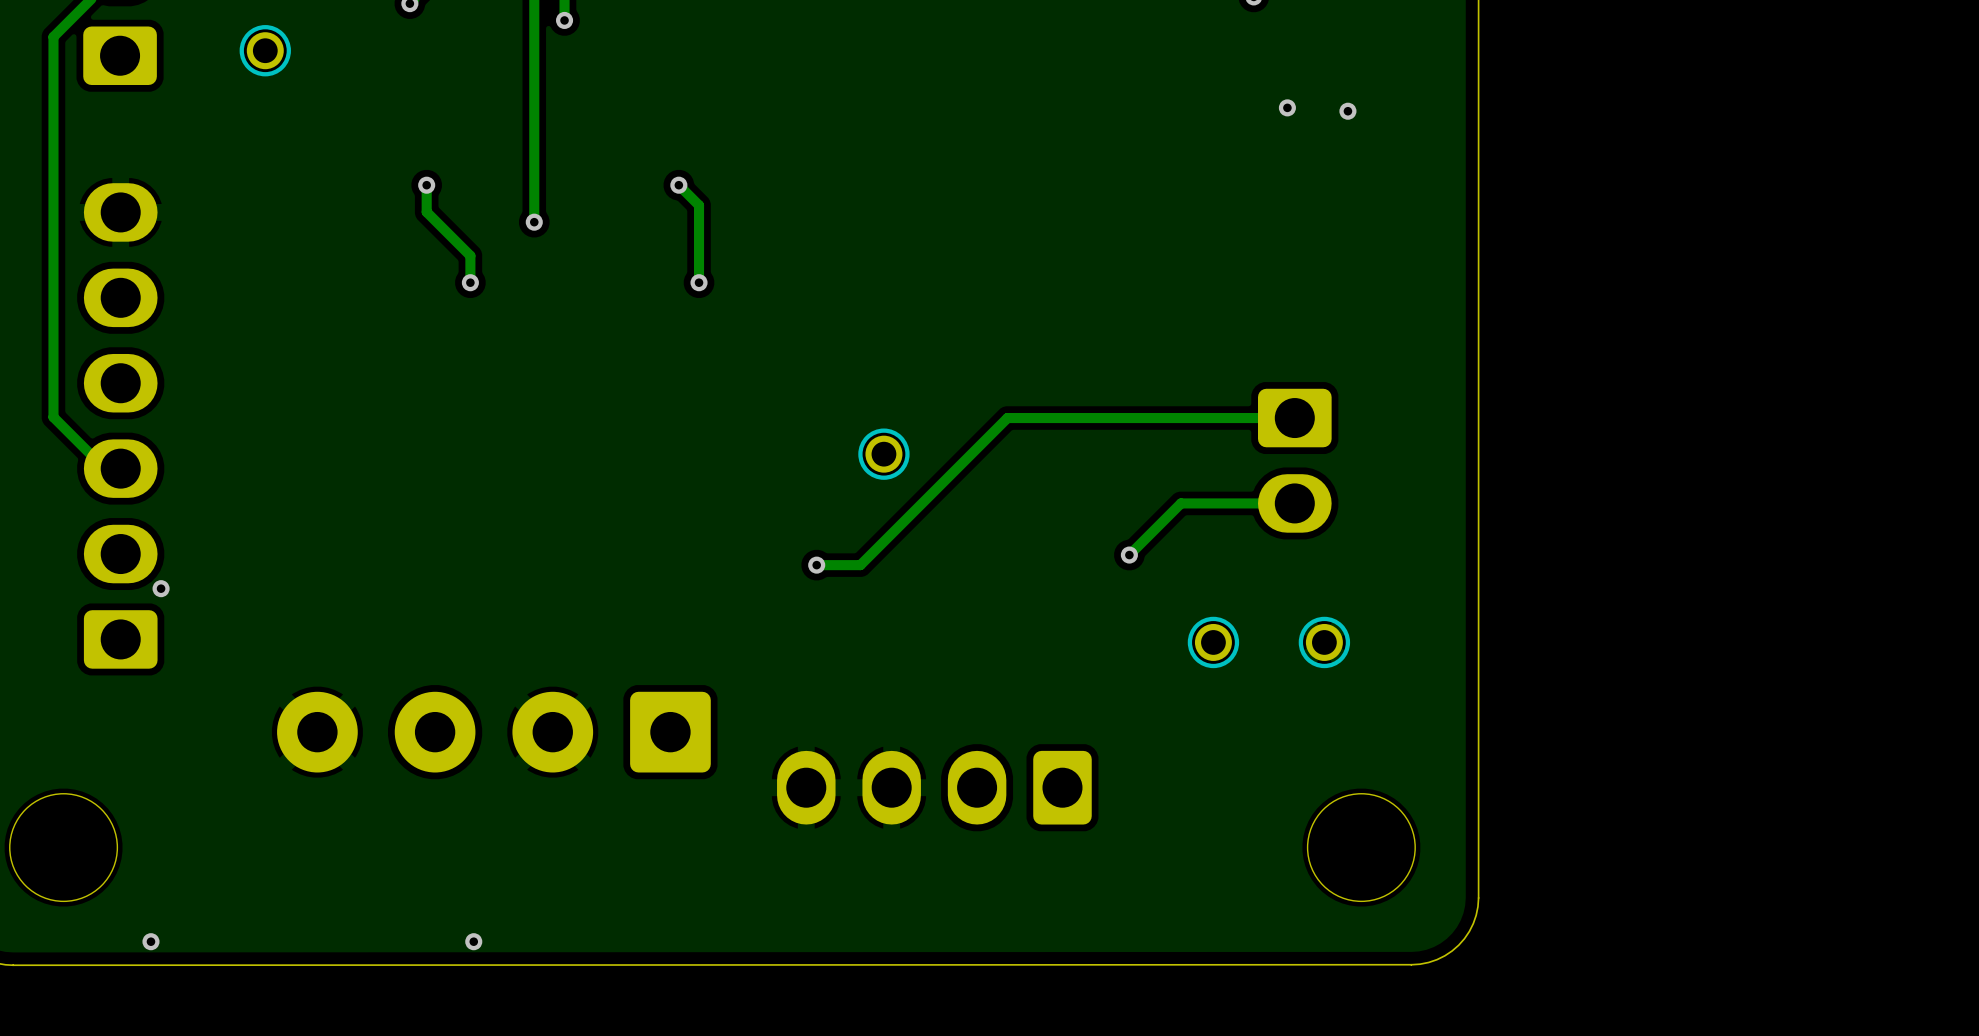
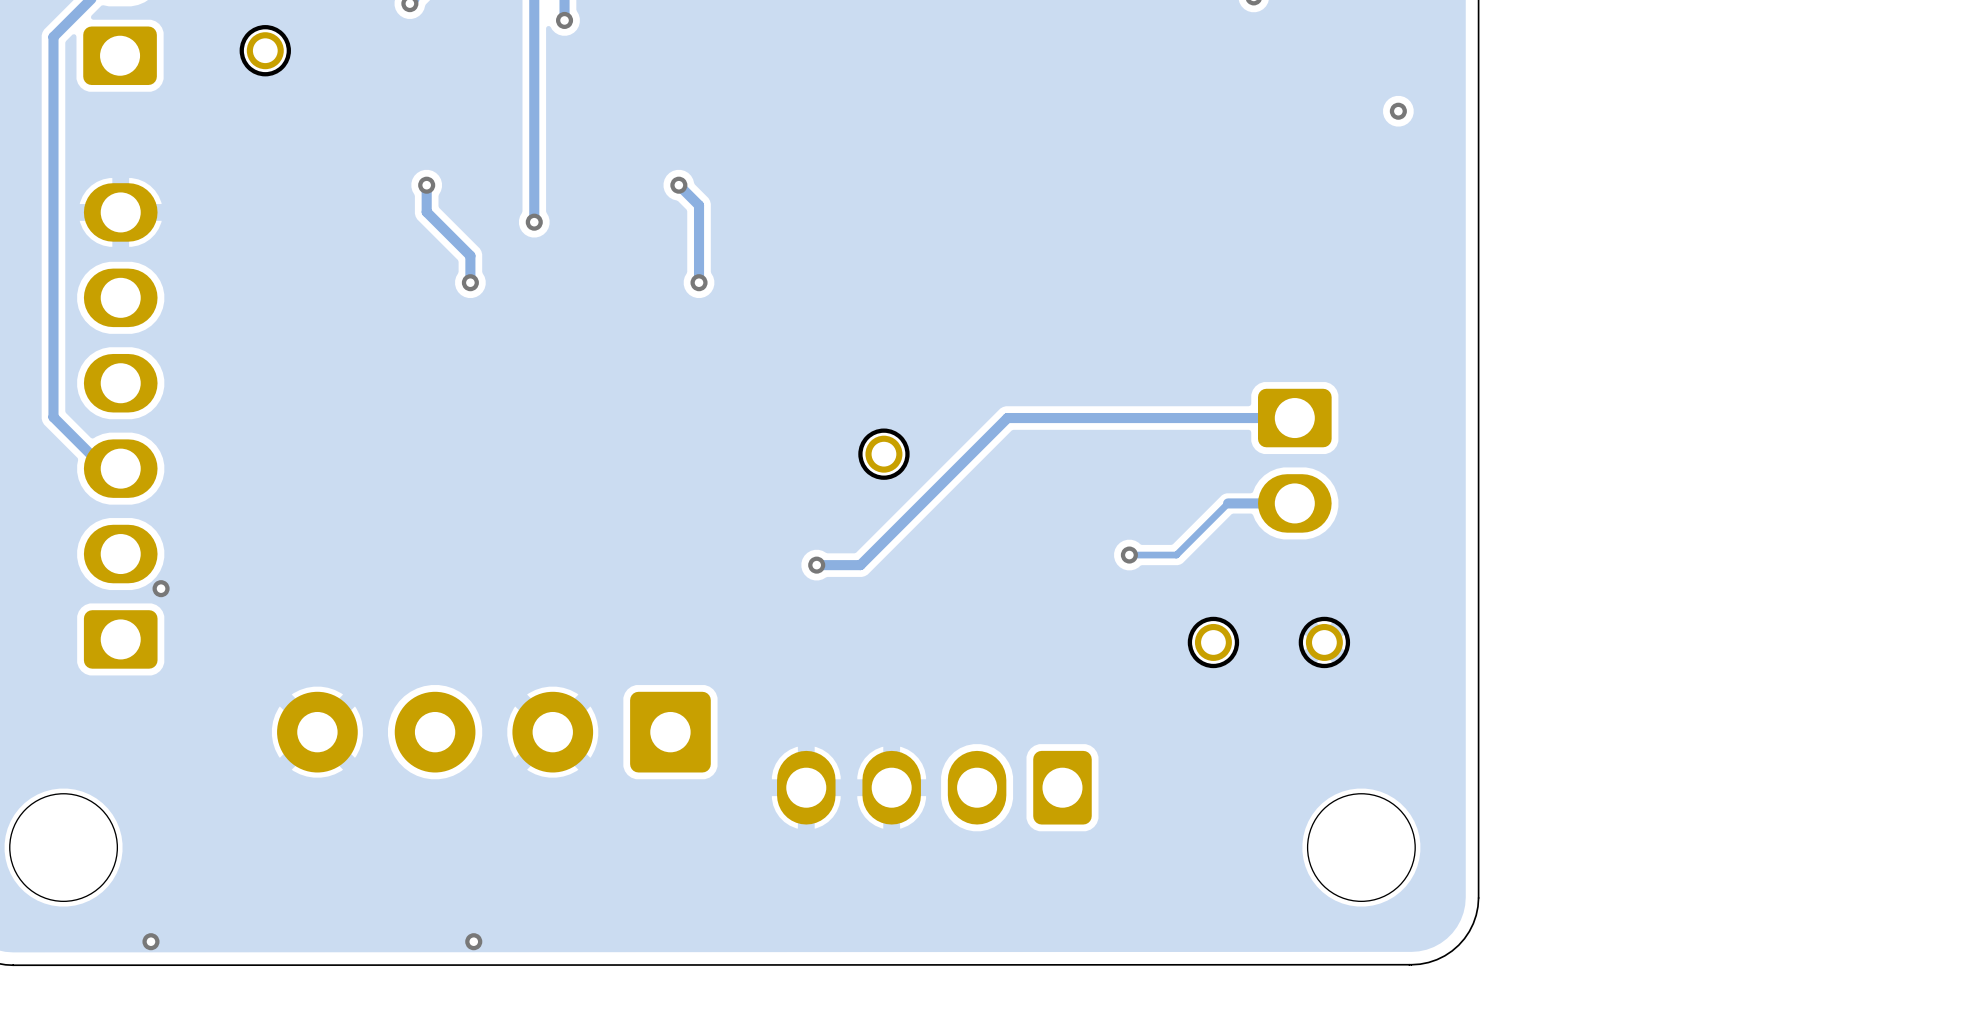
via: (1287, 107) -> none
via position: (1347, 111) -> (1398, 111)
track: (1228, 503) (1181, 503) (1129, 555) -> (1228, 503) (1176, 555) (1129, 555)

